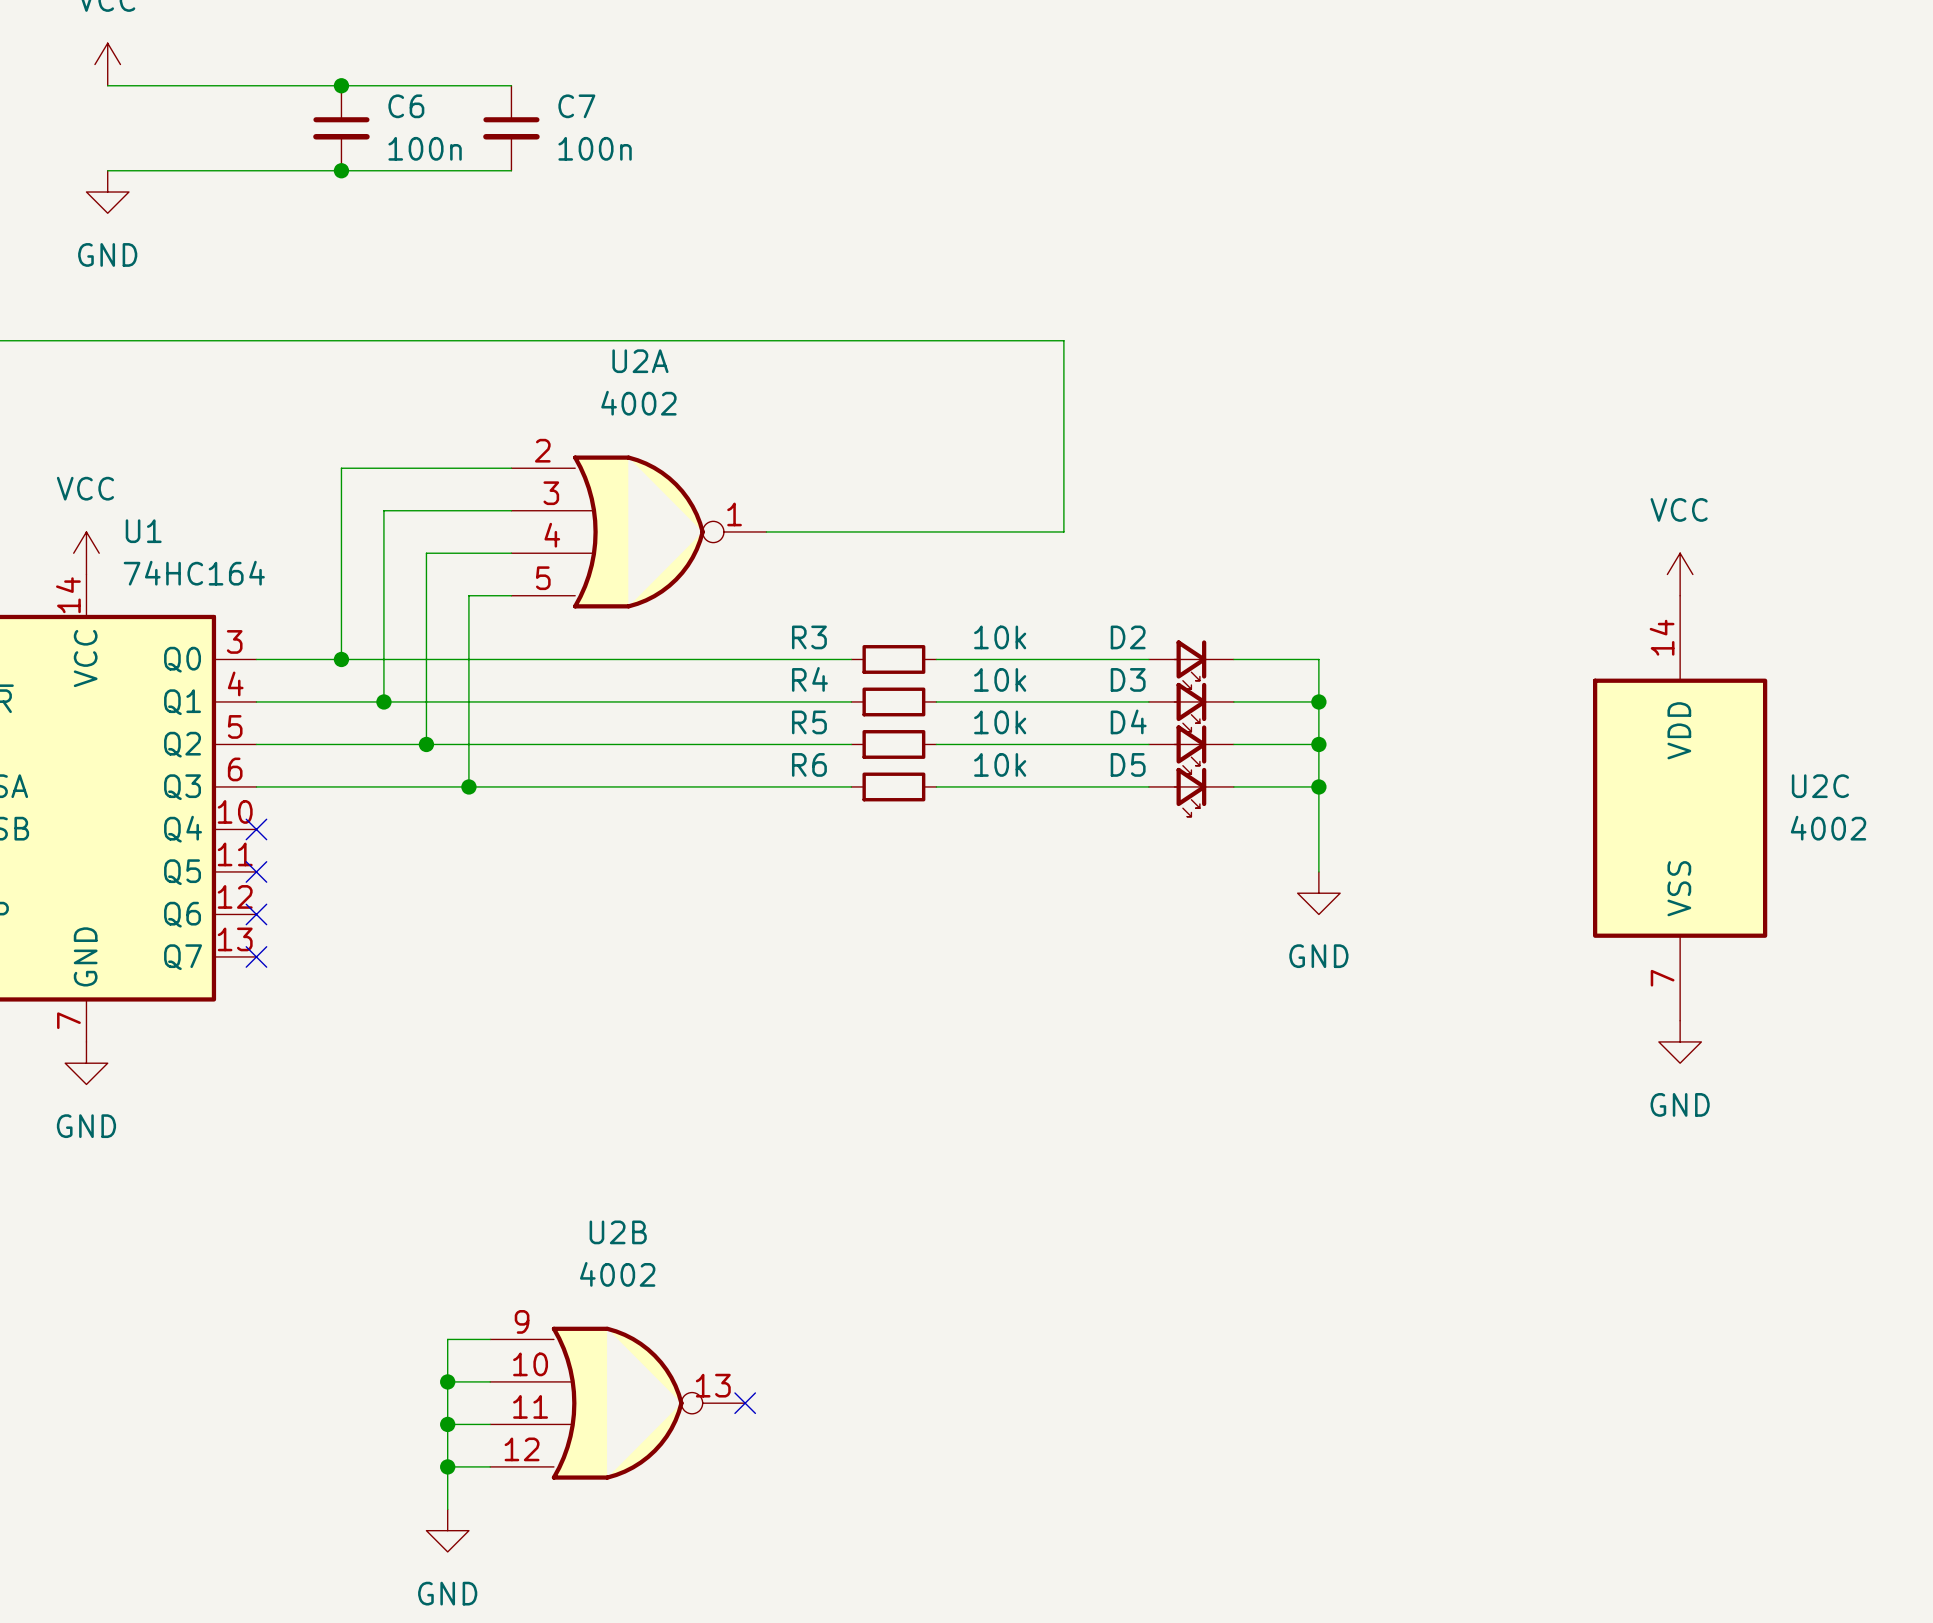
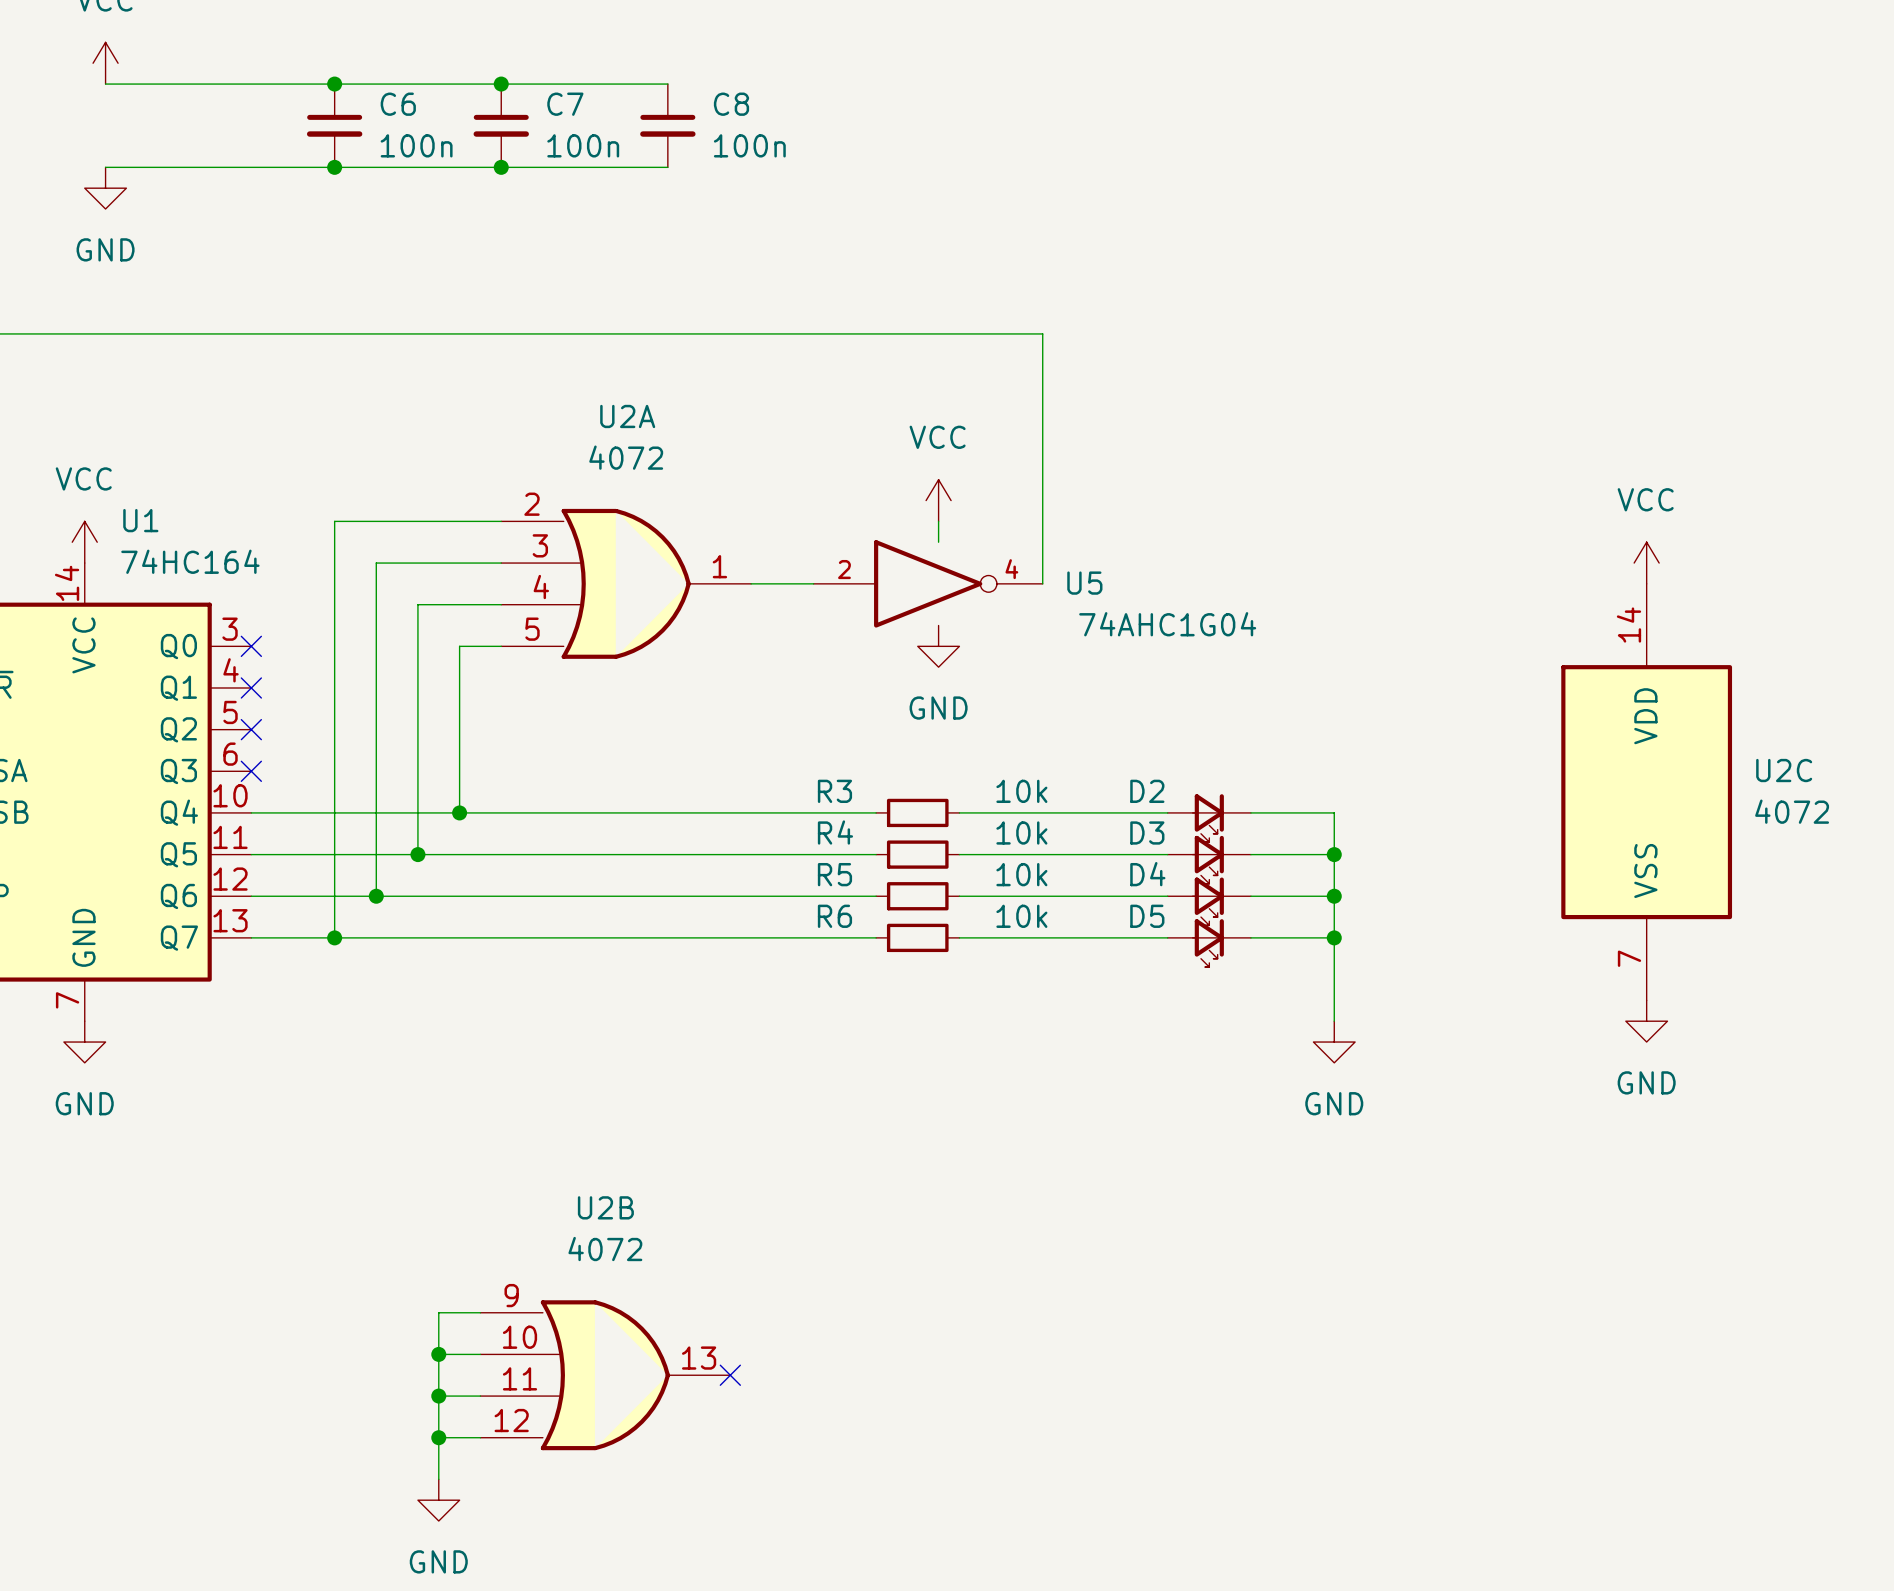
wire: none -> (501, 84) (667, 84)
junction: none -> (501, 84)
C8: none -> 100n (667, 125)
wire: none -> (501, 167) (667, 167)
junction: none -> (501, 167)
U2A value: 4002 (638, 403) -> 4072 (626, 457)
U2A symbol: [511, 455, 767, 609] -> [501, 508, 752, 659]
wire: (511, 468) (341, 468) (341, 531) -> (501, 521) (334, 521)
wire: (511, 510) (383, 510) (383, 574) -> (501, 563) (376, 563)
power symbol: none -> VCC (938, 500)
wire: (766, 531) (1063, 531) -> (1042, 583) (1042, 521)
wire: none -> (938, 521) (938, 542)
wire: (511, 553) (426, 553) (426, 616) -> (501, 604) (417, 604)
wire: (511, 595) (468, 595) (468, 659) (256, 659) -> none
wire: none -> (751, 583) (813, 583)
U5: none -> 74AHC1G04 (928, 583)
no-connect mark: none -> (251, 646)
wire: none -> (334, 646) (334, 937)
junction: (341, 659) -> none
wire: (511, 659) (851, 659) -> none
R3 position: (893, 659) -> (917, 812)
wire: (936, 659) (1148, 659) -> (959, 812) (1167, 812)
power symbol: none -> GND (938, 646)
wire: (1233, 659) (1318, 659) (1318, 871) -> (1250, 812) (1334, 812) (1334, 1021)
D2 position: (1191, 664) -> (1209, 818)
wire: (256, 701) (851, 701) -> none
no-connect mark: none -> (251, 687)
wire: none -> (376, 687) (376, 896)
junction: (383, 701) -> none
R4 position: (893, 701) -> (917, 854)
wire: (936, 701) (1148, 701) -> (959, 854) (1167, 854)
wire: (1233, 701) (1318, 701) -> (1250, 854) (1334, 854)
junction: (1318, 701) -> none
D3 position: (1191, 707) -> (1209, 859)
wire: (256, 744) (851, 744) -> none
no-connect mark: none -> (251, 729)
wire: none -> (417, 729) (417, 854)
junction: (426, 744) -> none
R5 position: (893, 744) -> (917, 896)
wire: (936, 744) (1148, 744) -> (959, 896) (1167, 896)
wire: (1233, 744) (1318, 744) -> (1250, 896) (1334, 896)
junction: (1318, 744) -> none
D4 position: (1191, 749) -> (1209, 901)
wire: (256, 786) (851, 786) -> none
no-connect mark: none -> (251, 771)
wire: none -> (459, 771) (459, 812)
junction position: (468, 786) -> (459, 812)
R6 position: (893, 786) -> (917, 937)
wire: (936, 786) (1148, 786) -> (959, 937) (1167, 937)
wire: (1233, 786) (1318, 786) -> (1250, 937) (1334, 937)
junction: (1318, 786) -> none
D5 position: (1191, 792) -> (1209, 943)
U2C value: 4002 (1828, 828) -> 4072 (1792, 811)
wire: none -> (251, 812) (876, 812)
no-connect mark: (256, 829) -> none
wire: none -> (251, 854) (876, 854)
no-connect mark: (256, 871) -> none
junction: none -> (417, 854)
junction: none -> (1334, 854)
power symbol position: GND (1318, 893) -> GND (1334, 1042)
wire: none -> (251, 896) (876, 896)
no-connect mark: (256, 914) -> none
junction: none -> (376, 896)
junction: none -> (1334, 896)
wire: none -> (251, 937) (876, 937)
no-connect mark: (256, 956) -> none
junction: none -> (334, 937)
junction: none -> (1334, 937)
U2B value: 4002 (617, 1274) -> 4072 (605, 1249)
U2B symbol: [490, 1326, 746, 1480] -> [480, 1300, 731, 1451]

